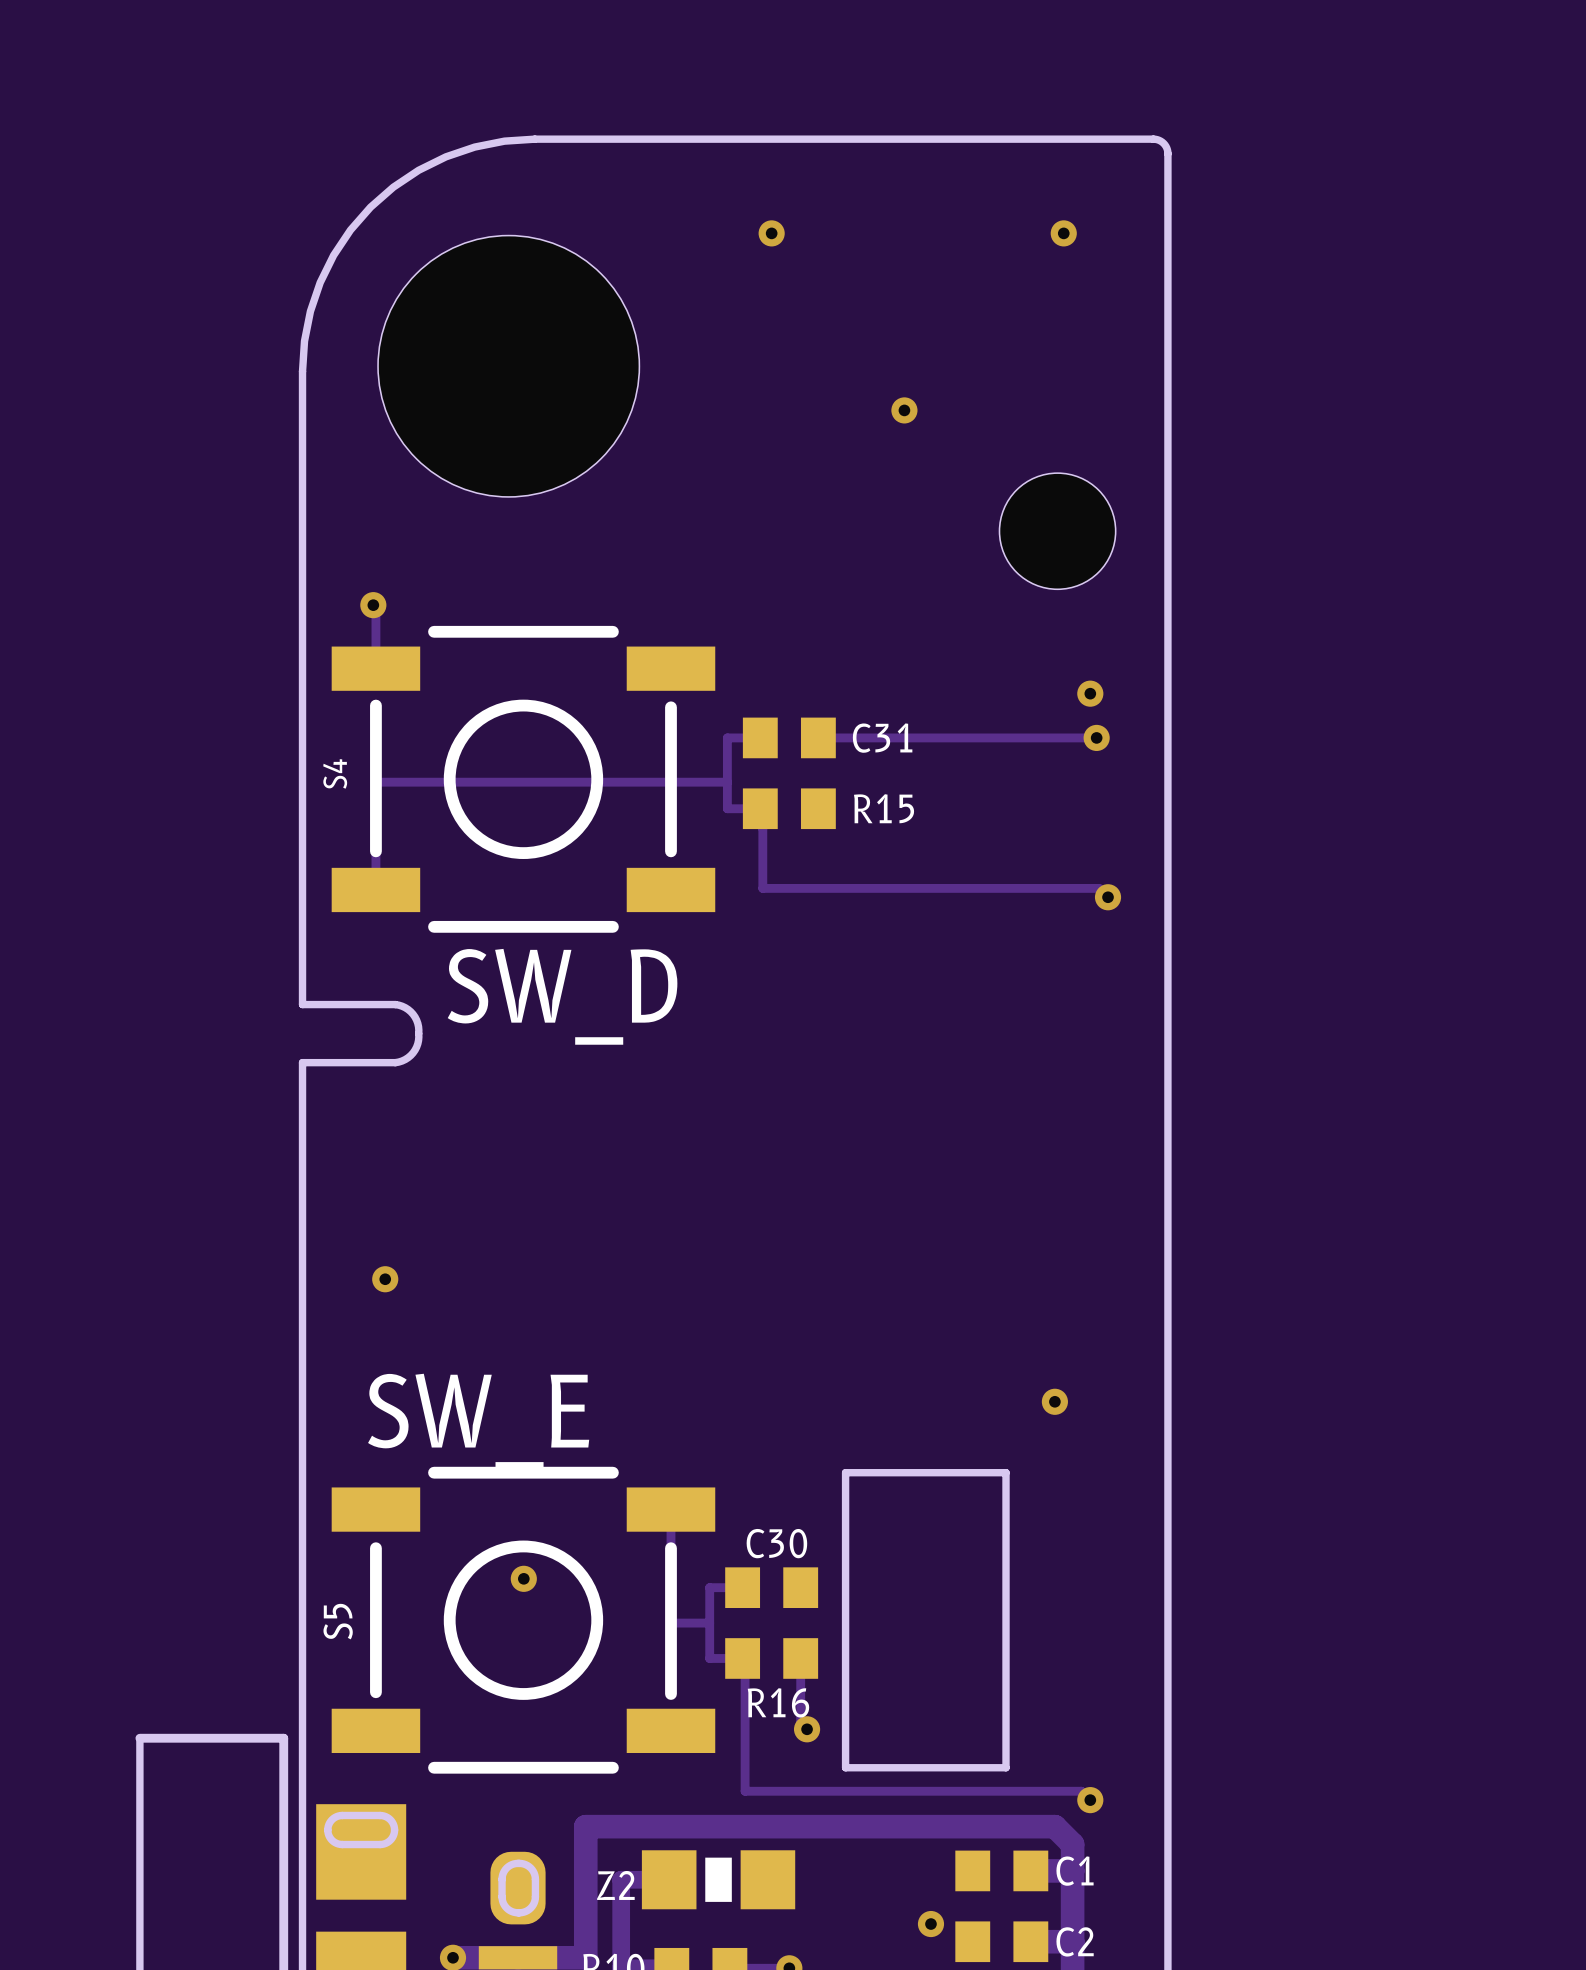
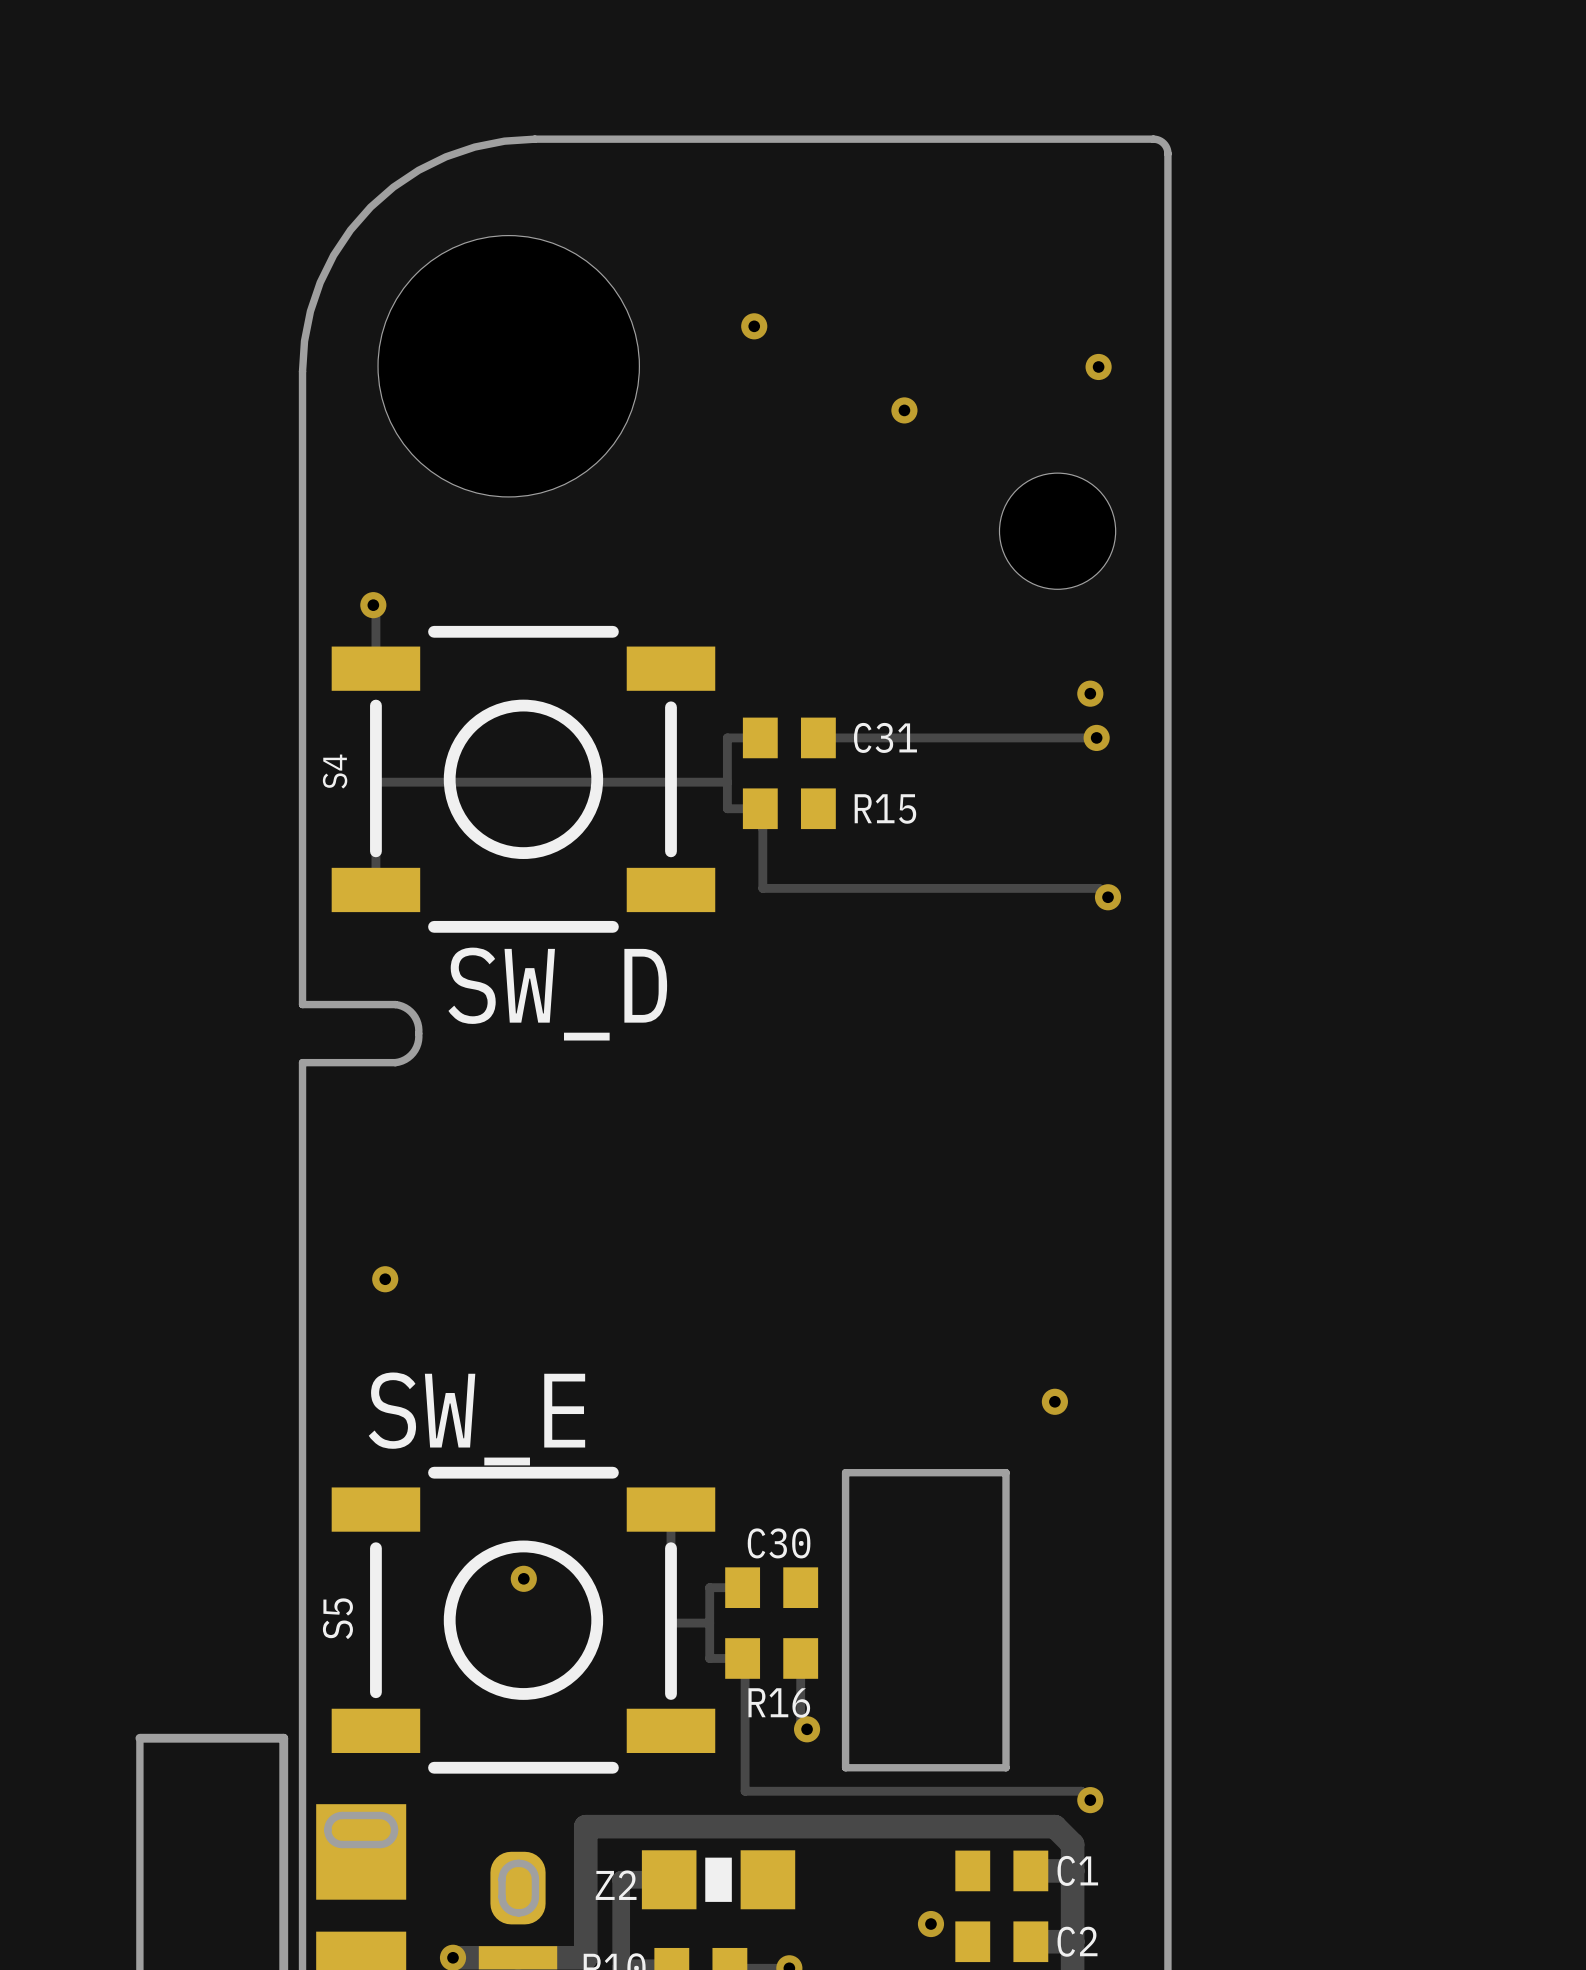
via position: (771, 233) -> (754, 326)
via position: (1063, 233) -> (1098, 366)

